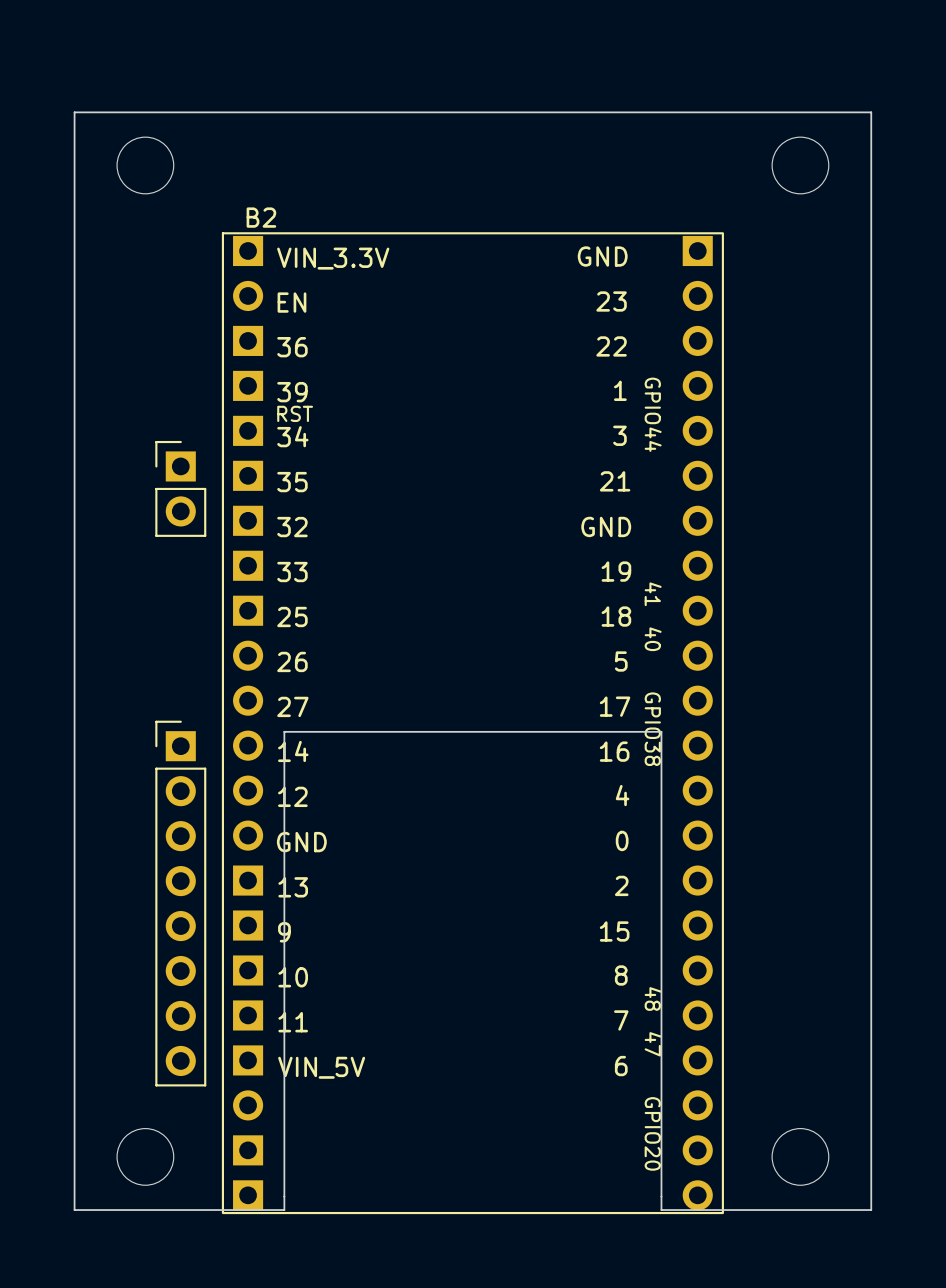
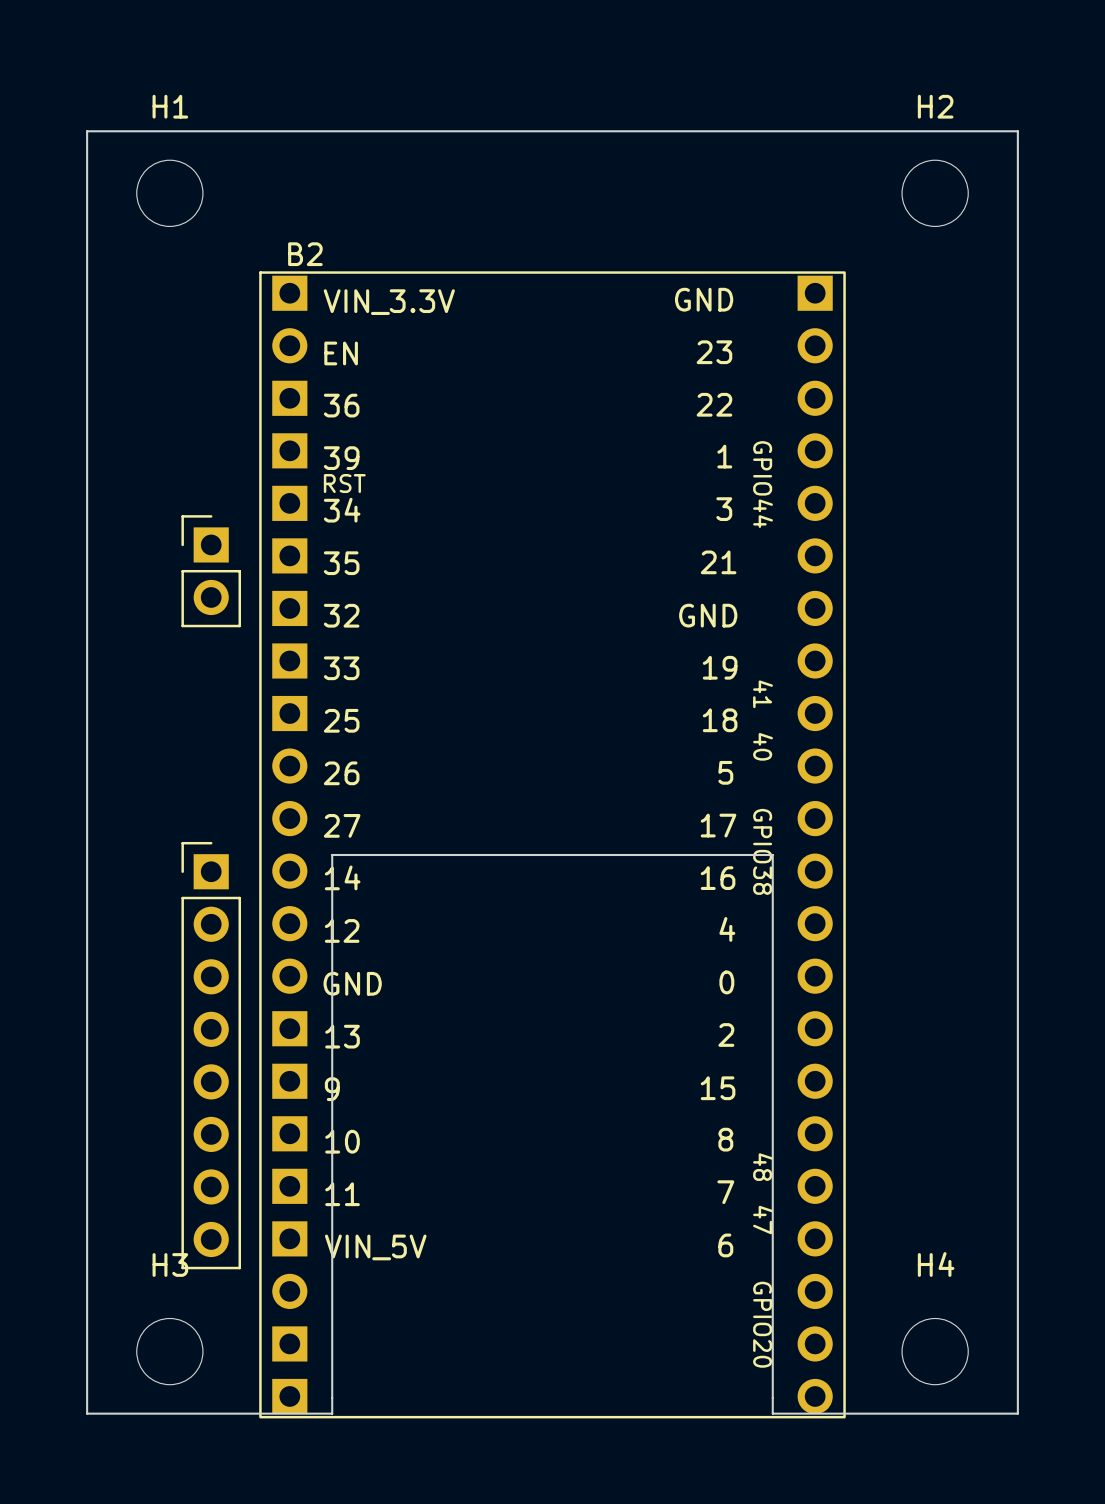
H1 name: none -> H1 (170, 106)
H2 name: none -> H2 (935, 106)
H3 name: none -> H3 (170, 1264)
H4 name: none -> H4 (936, 1264)

